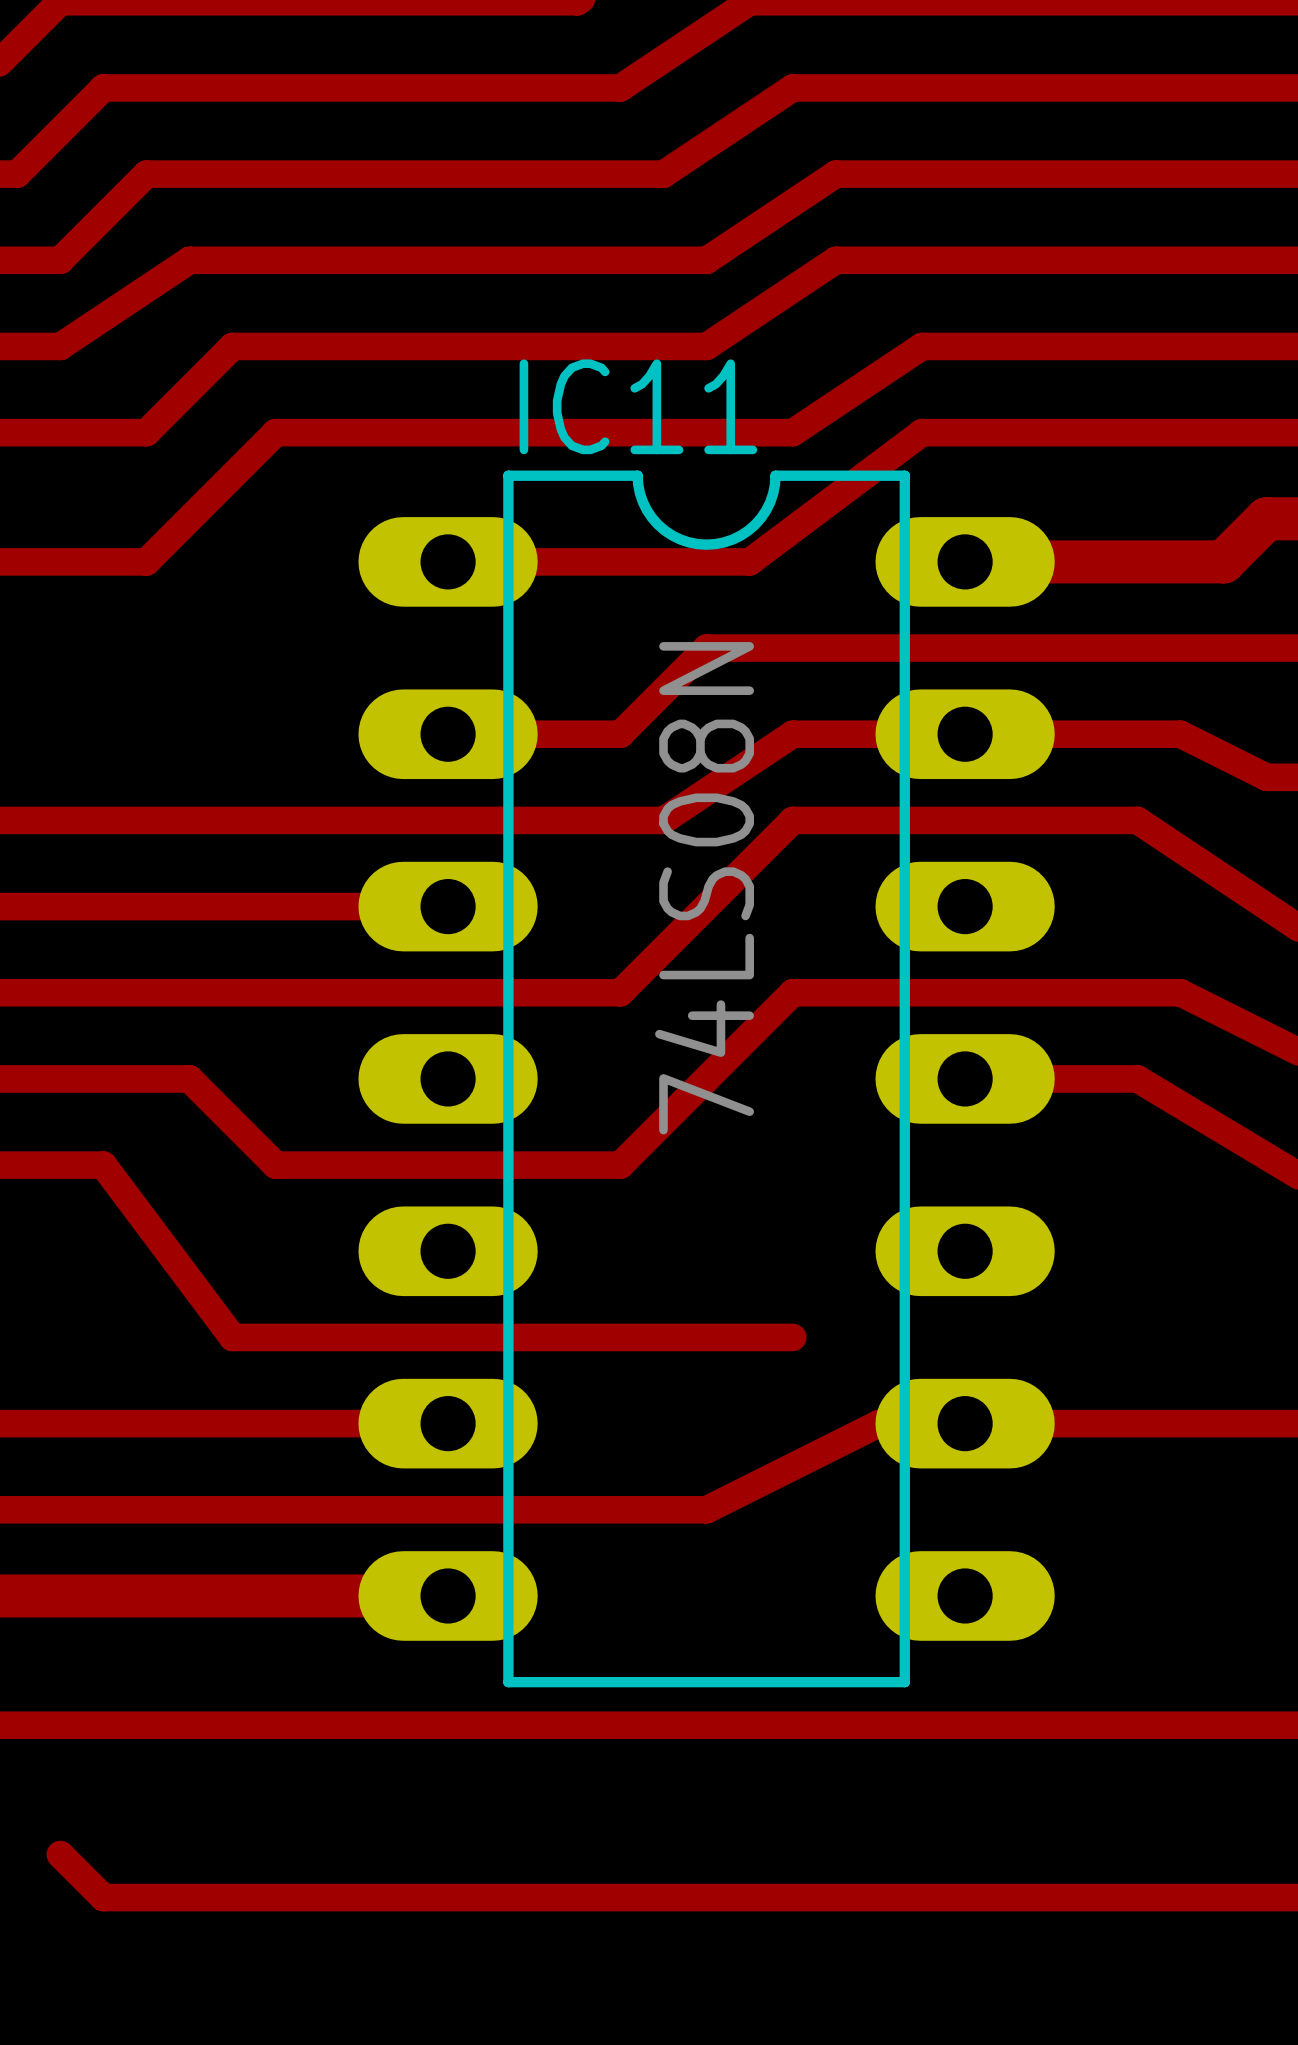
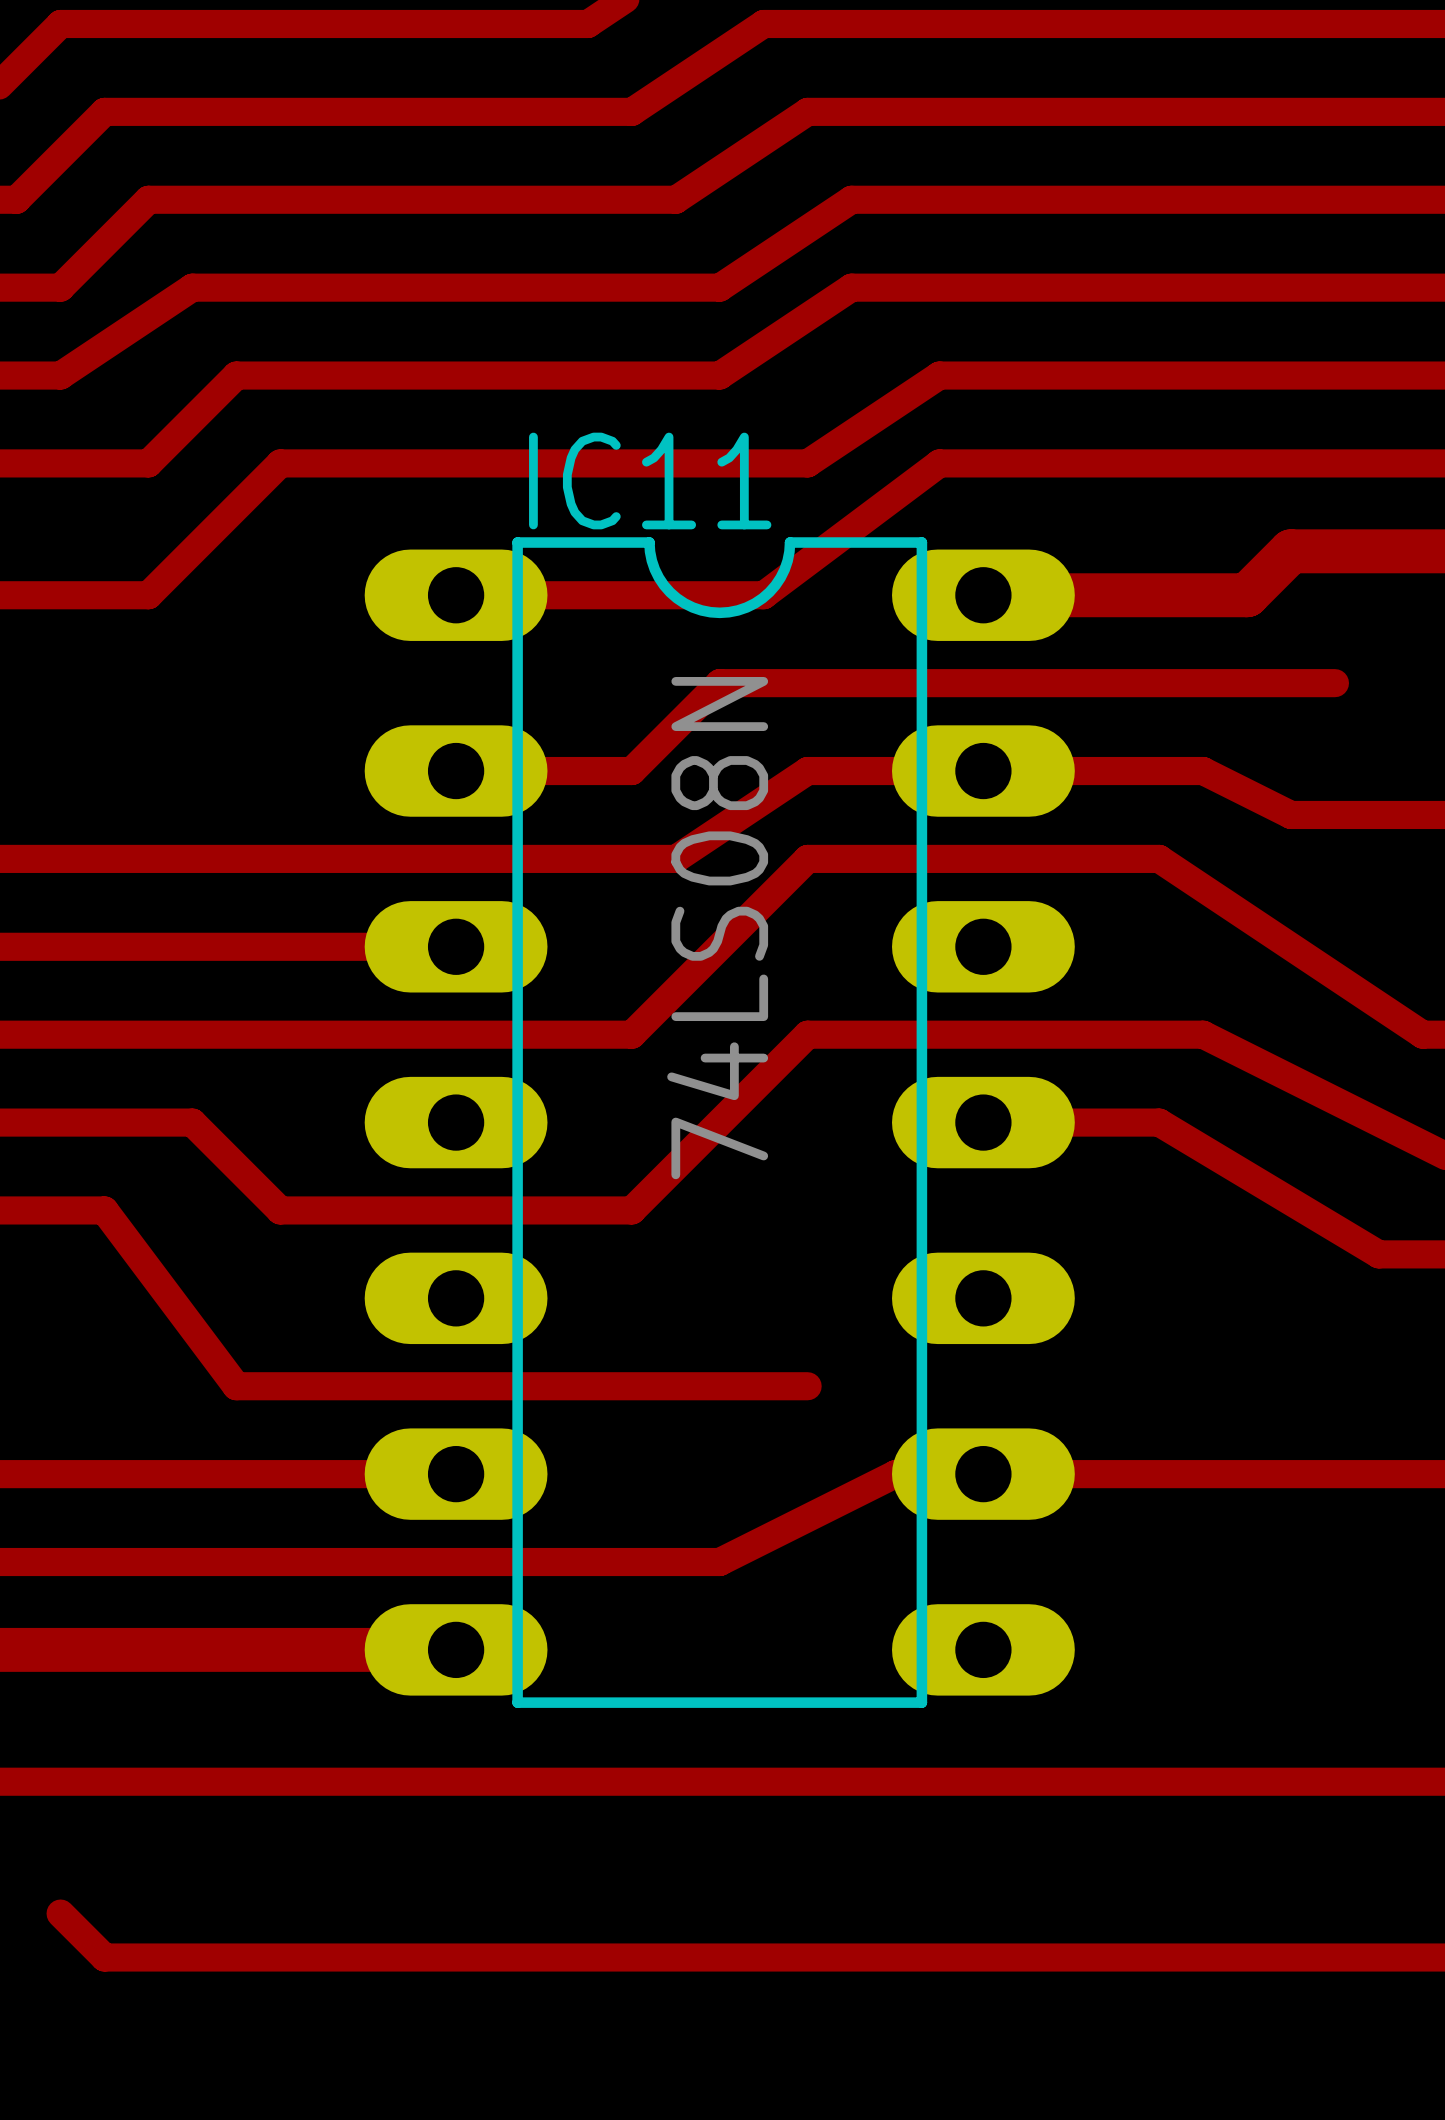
IC11 name position: IC11 (638, 406) -> IC11 (650, 481)
IC11 footprint: [358, 470, 1055, 1688] -> [364, 537, 1075, 1708]

